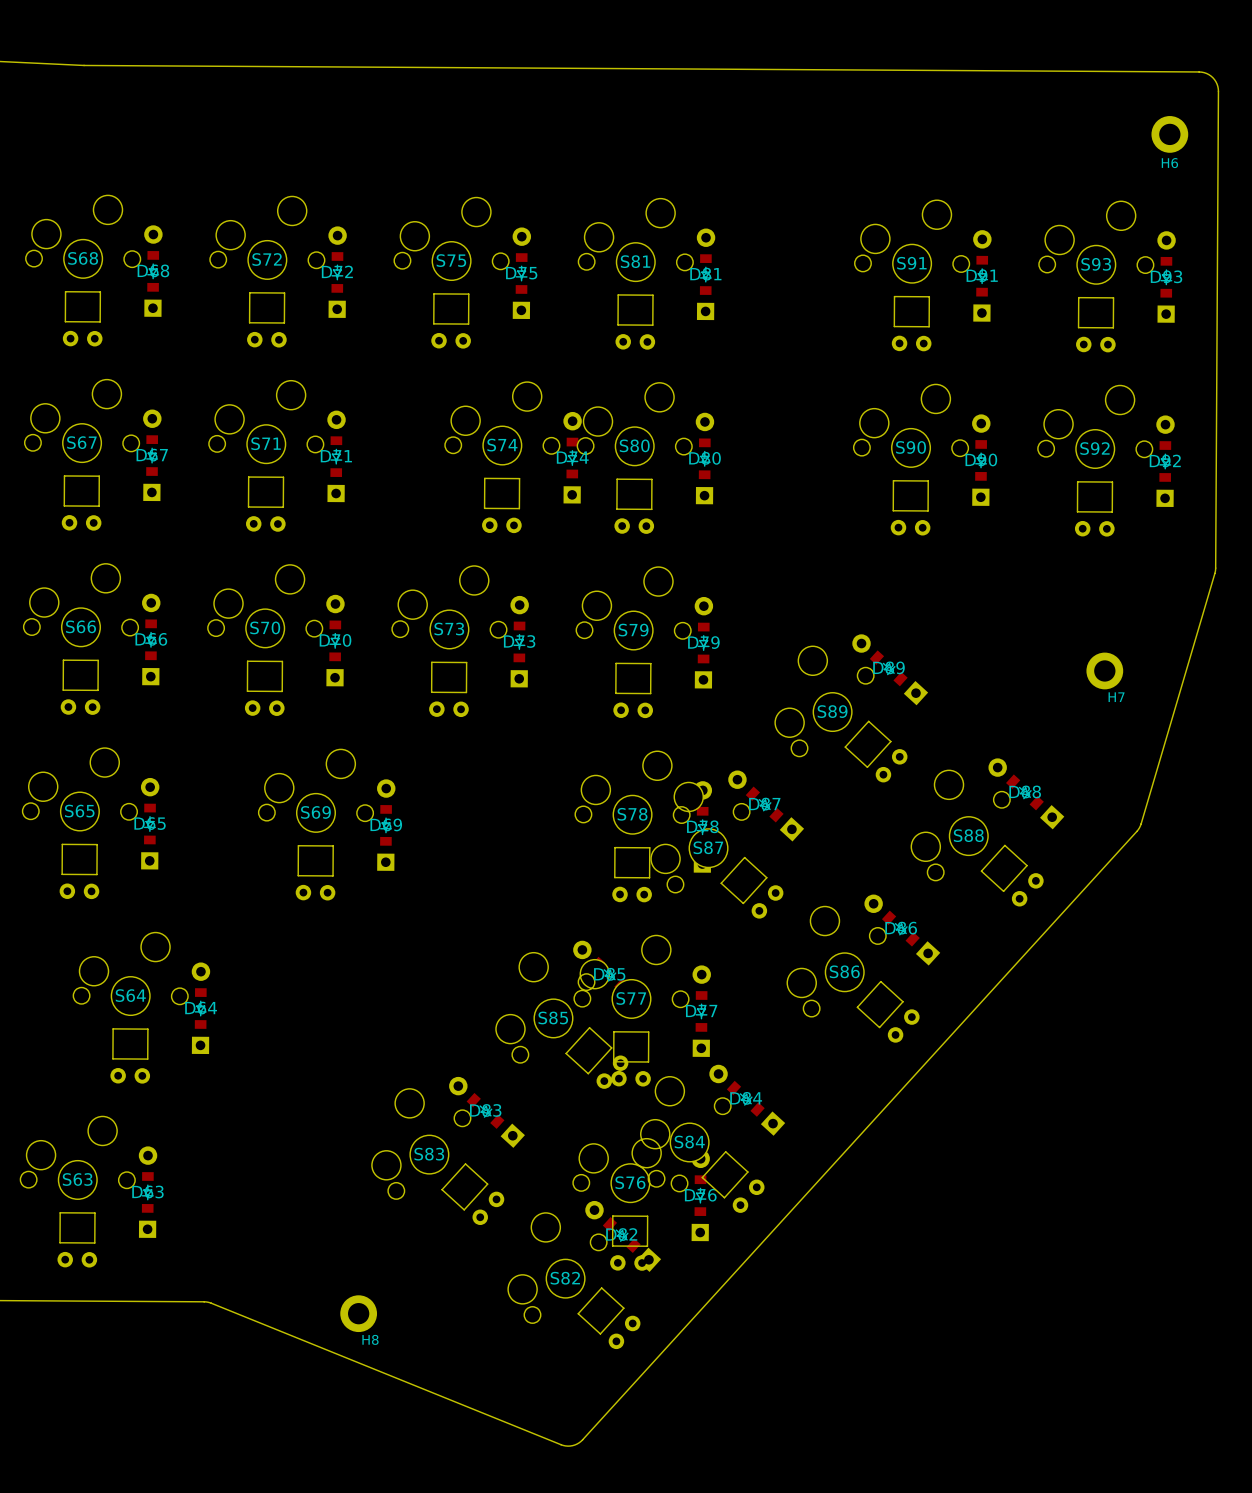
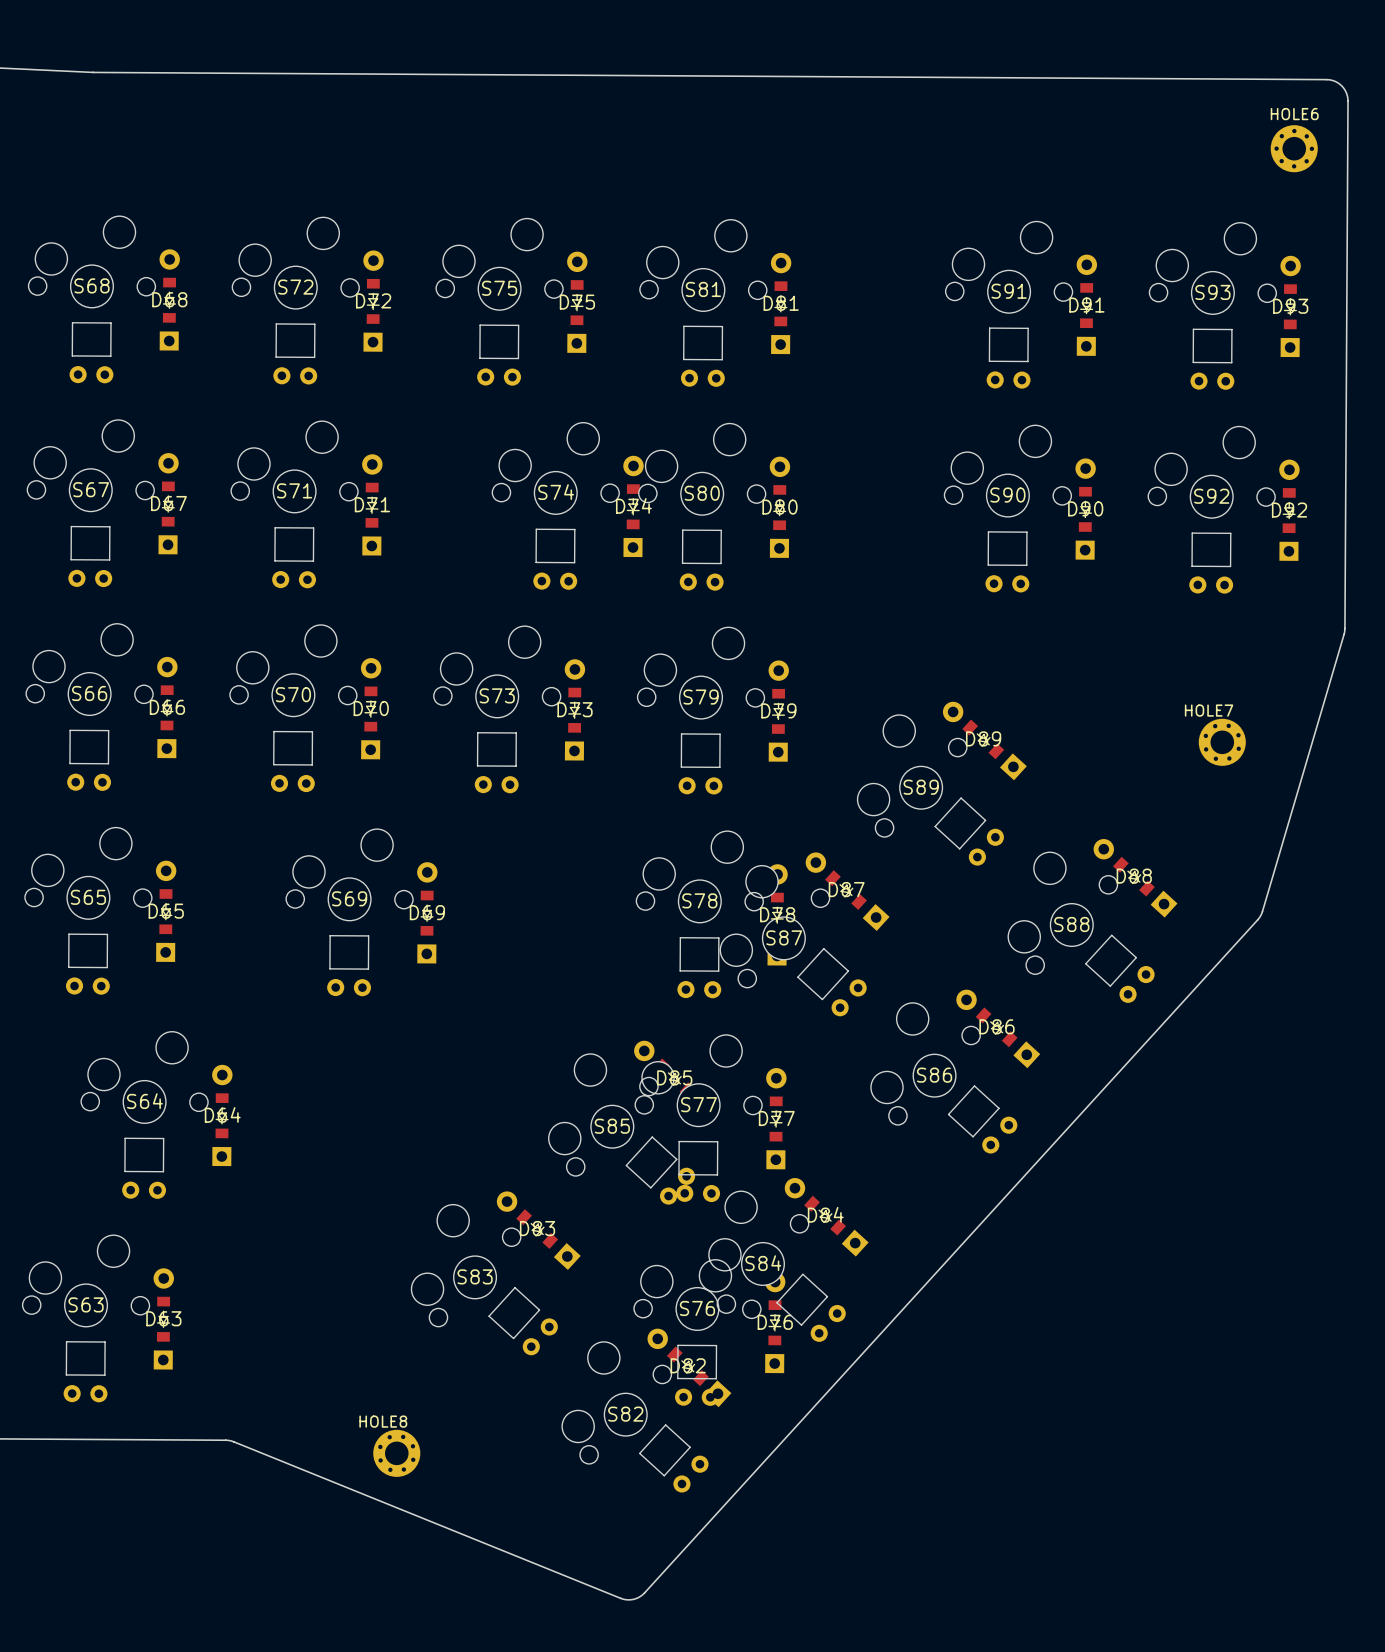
H6: (1169, 134) -> none
HOLE6: none -> (1294, 148)
H7: (1104, 670) -> none
HOLE7: none -> (1222, 742)
H8: (358, 1313) -> none
HOLE8: none -> (396, 1453)

